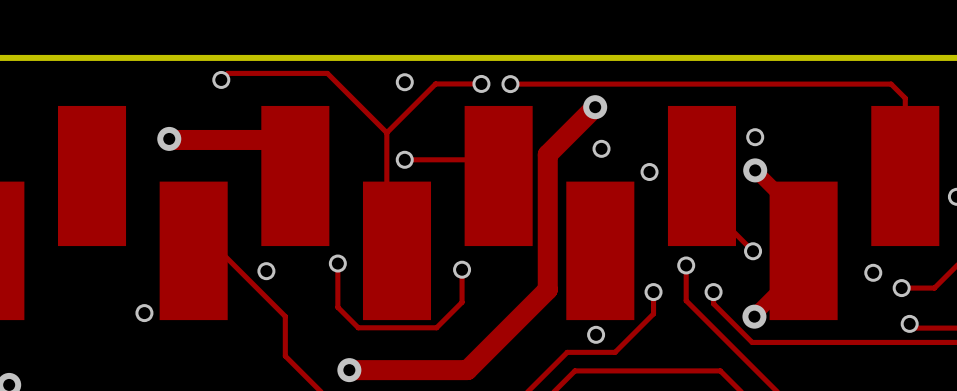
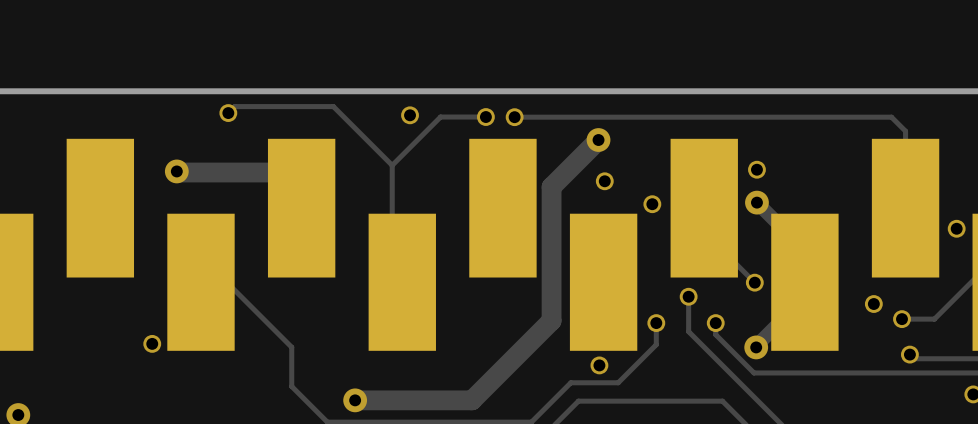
track: (498, 139) (478, 159) (404, 159) -> none
via: (404, 159) -> none
track: (337, 263) (337, 307) (358, 327) (436, 327) (462, 302) (462, 269) -> none
via: (337, 263) -> none
via: (462, 269) -> none
via: (266, 271) -> none

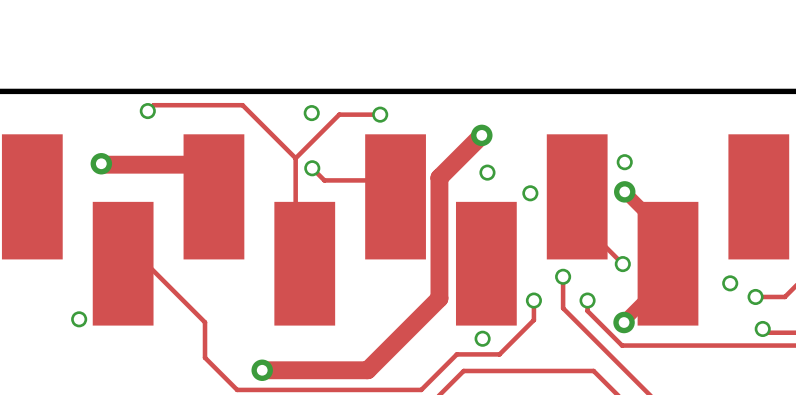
track: (514, 117) (891, 117) (905, 131) (905, 172) -> none
via position: (514, 117) -> (312, 168)
track: none -> (312, 168) (324, 180) (379, 180)

